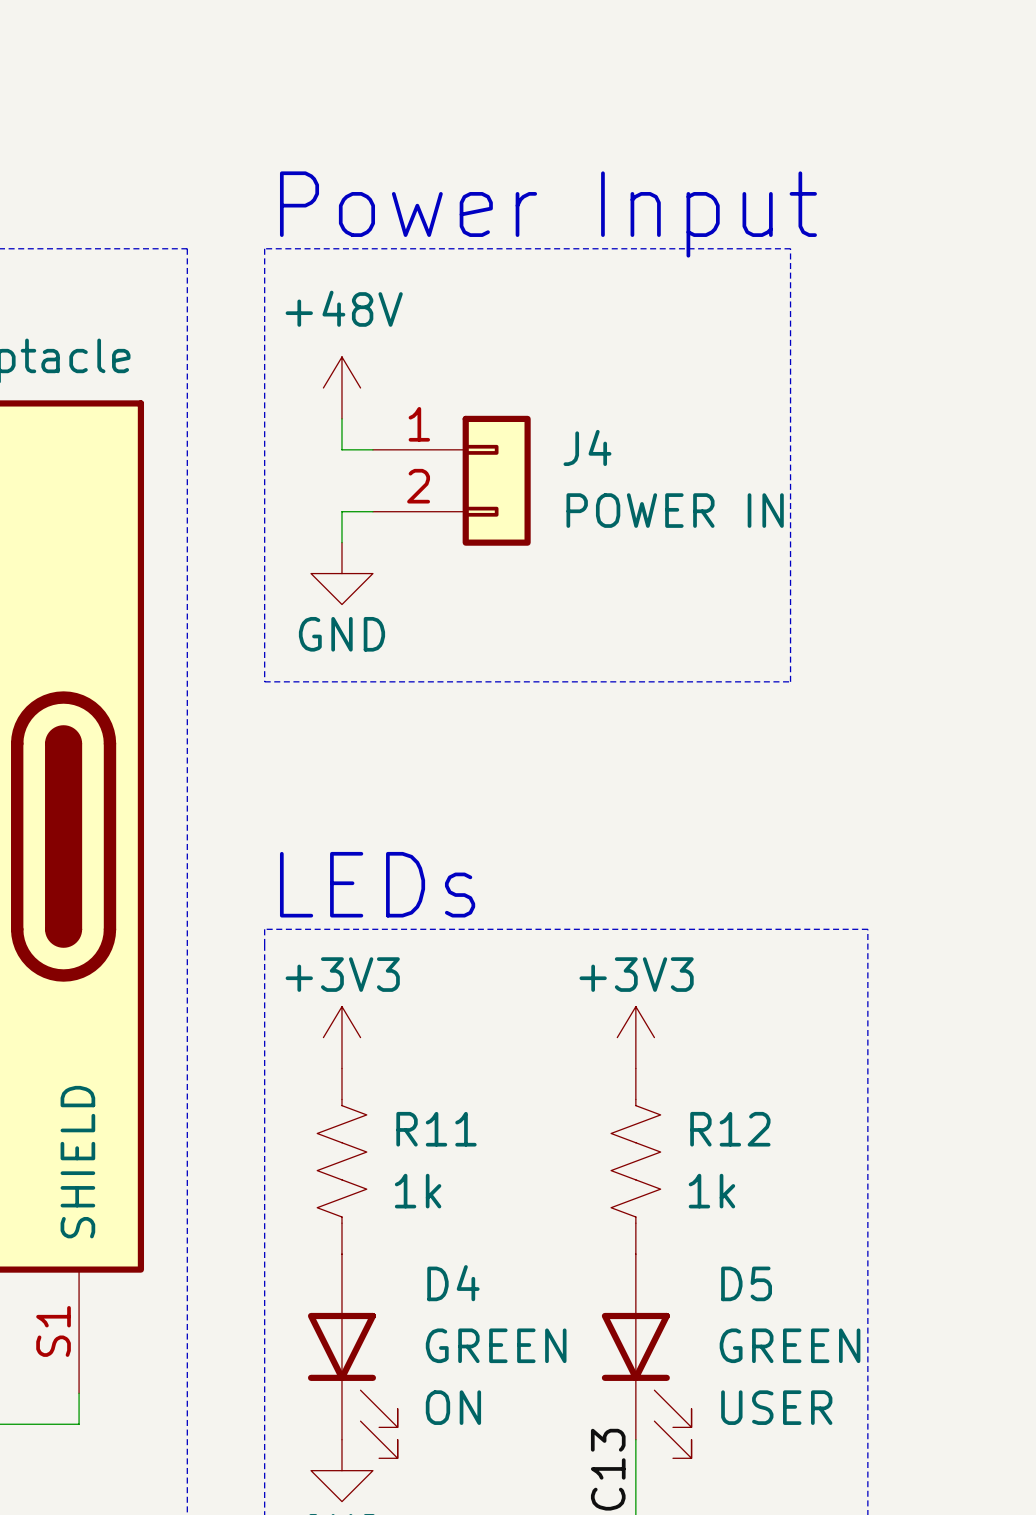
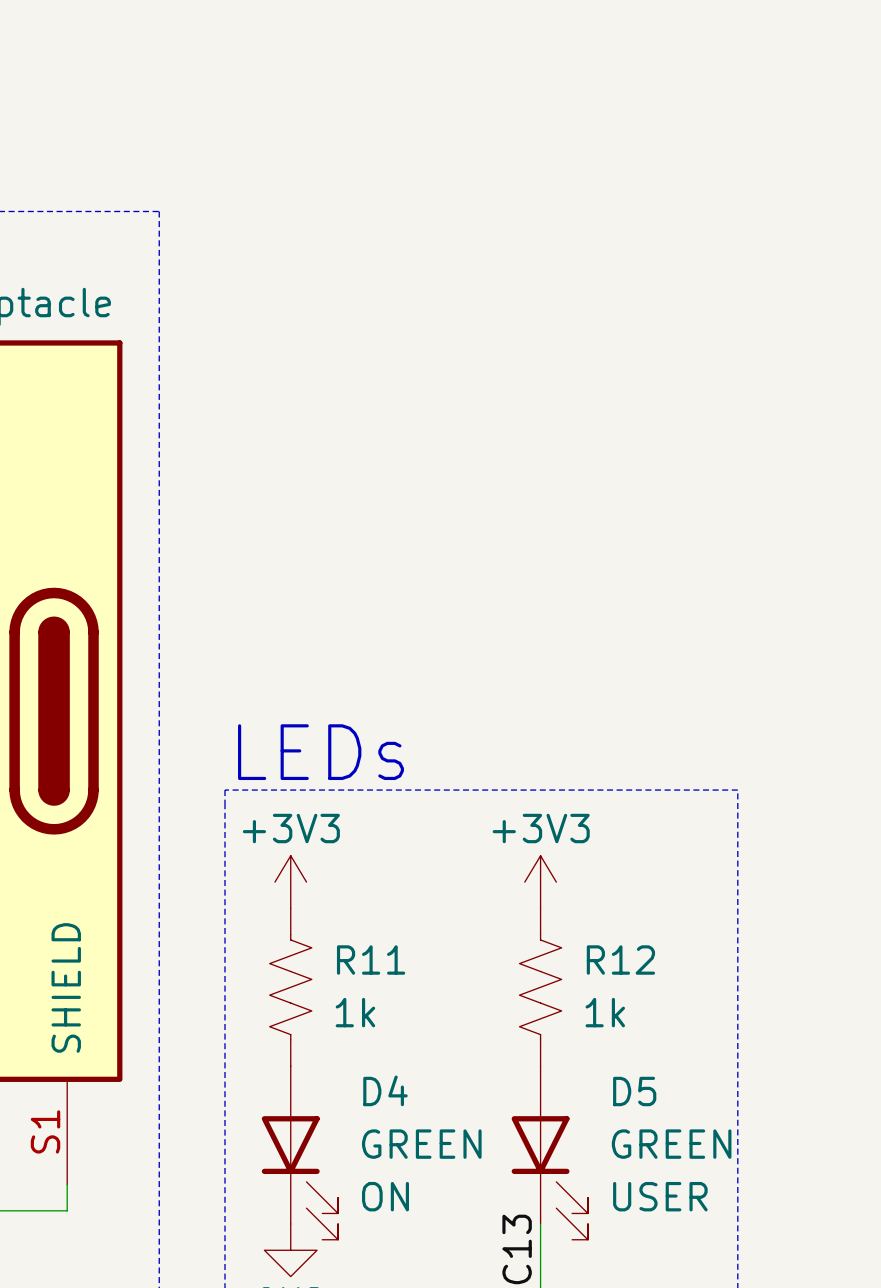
text: Power Input (548, 214) -> none
line: (264, 248) (790, 248) (790, 681) (264, 681) (264, 248) -> none
power symbol: +48V (341, 387) -> none
wire: (341, 418) (341, 449) (372, 449) -> none
J4: POWER IN (451, 480) -> none
wire: (372, 511) (341, 511) (341, 542) -> none
power symbol: GND (341, 573) -> none

